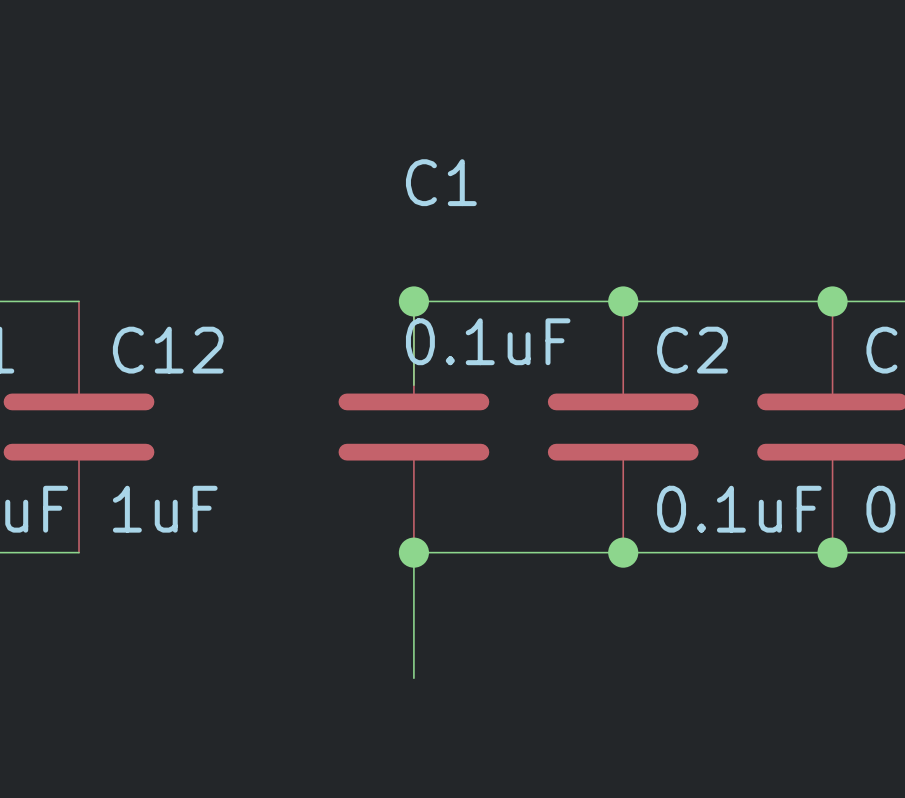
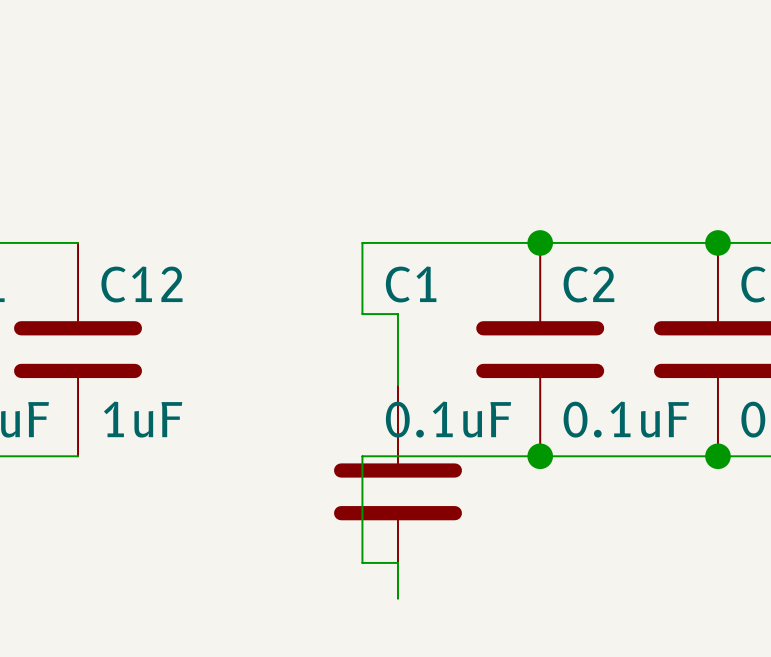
junction: (413, 301) -> none
wire: none -> (362, 314) (397, 314) (397, 385)
C1 position: (413, 427) -> (397, 491)
junction: (413, 552) -> none
wire: none -> (362, 562) (397, 562) (397, 598)

